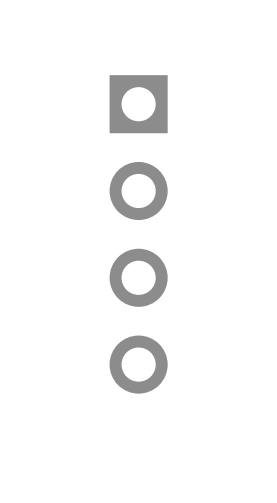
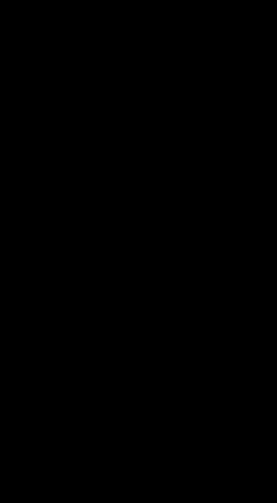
part: (138, 234) -> none

